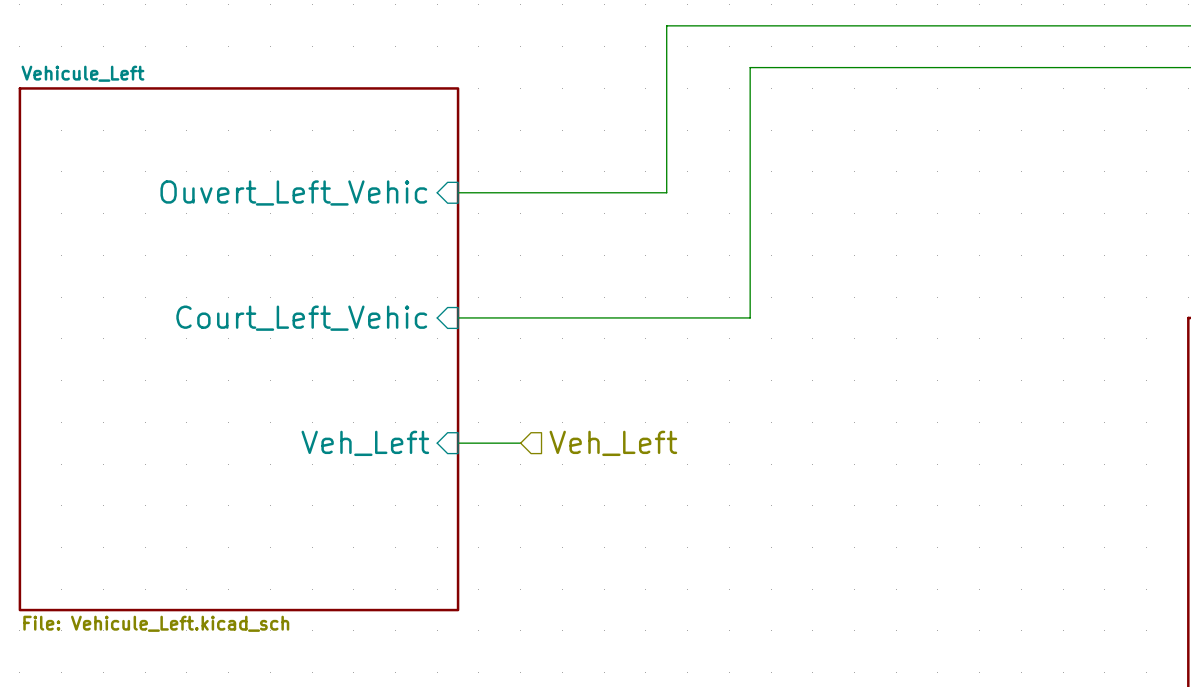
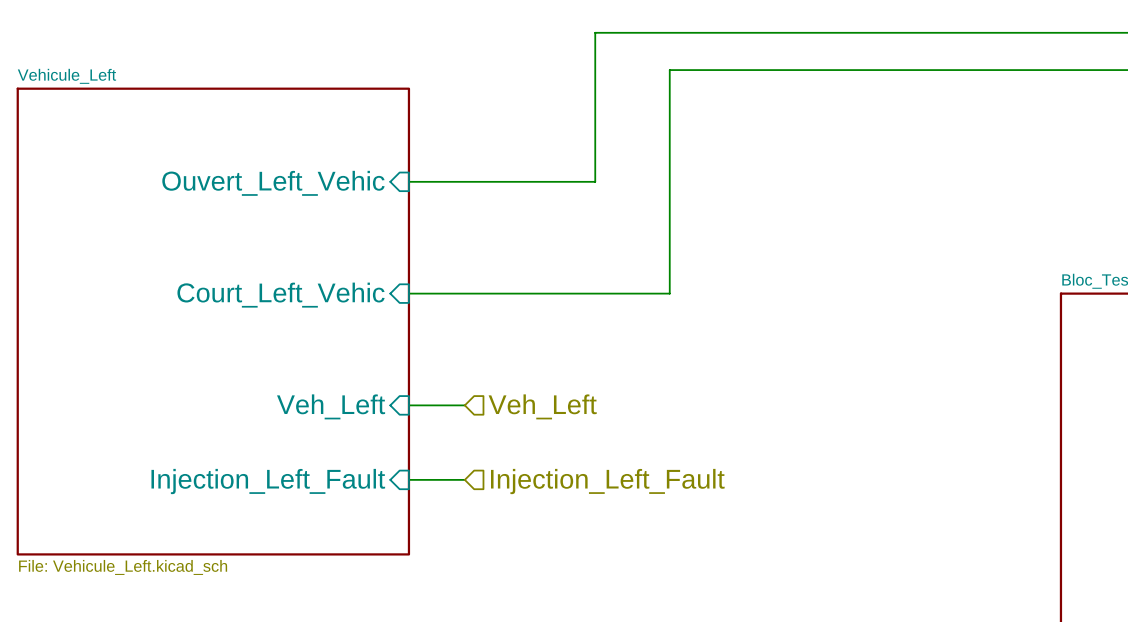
wire: none -> (408, 479) (464, 479)
sheet pin: none -> Injection_Left_Fault (268, 481)
hierarchical label: none -> Injection_Left_Fault (607, 481)

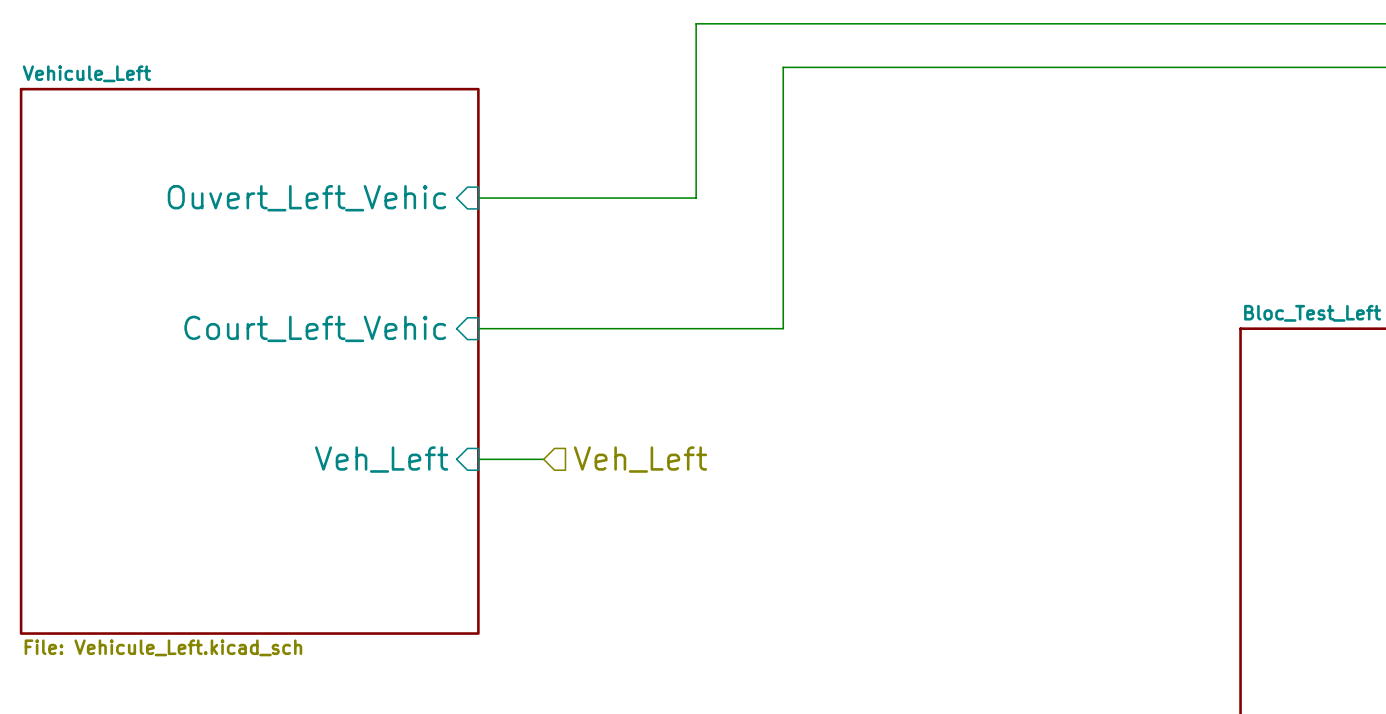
wire: (408, 479) (464, 479) -> none
sheet pin: Injection_Left_Fault (268, 481) -> none
hierarchical label: Injection_Left_Fault (607, 481) -> none

